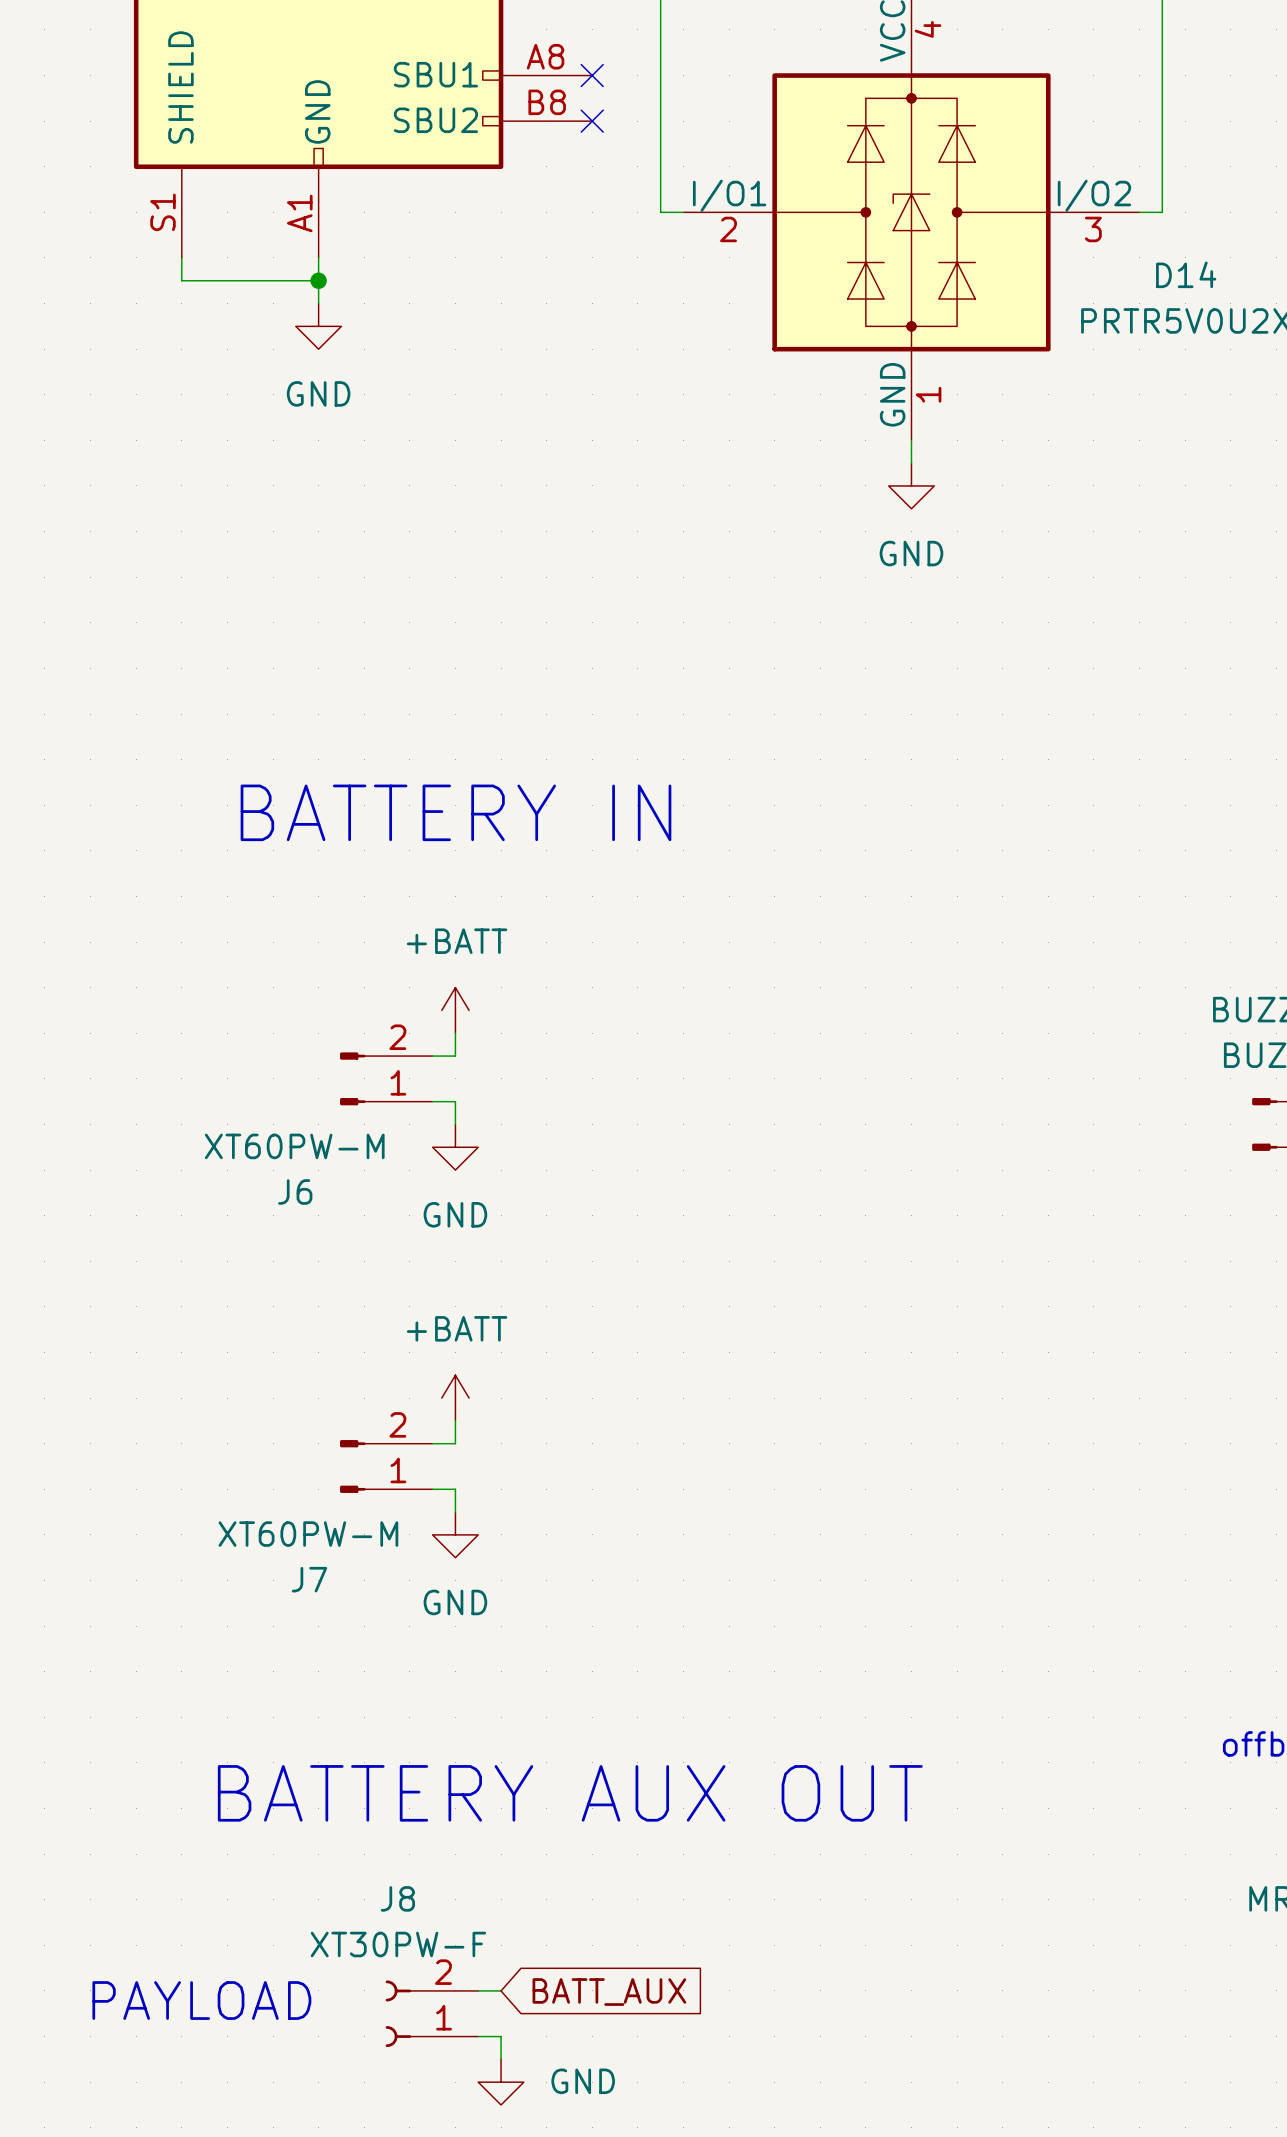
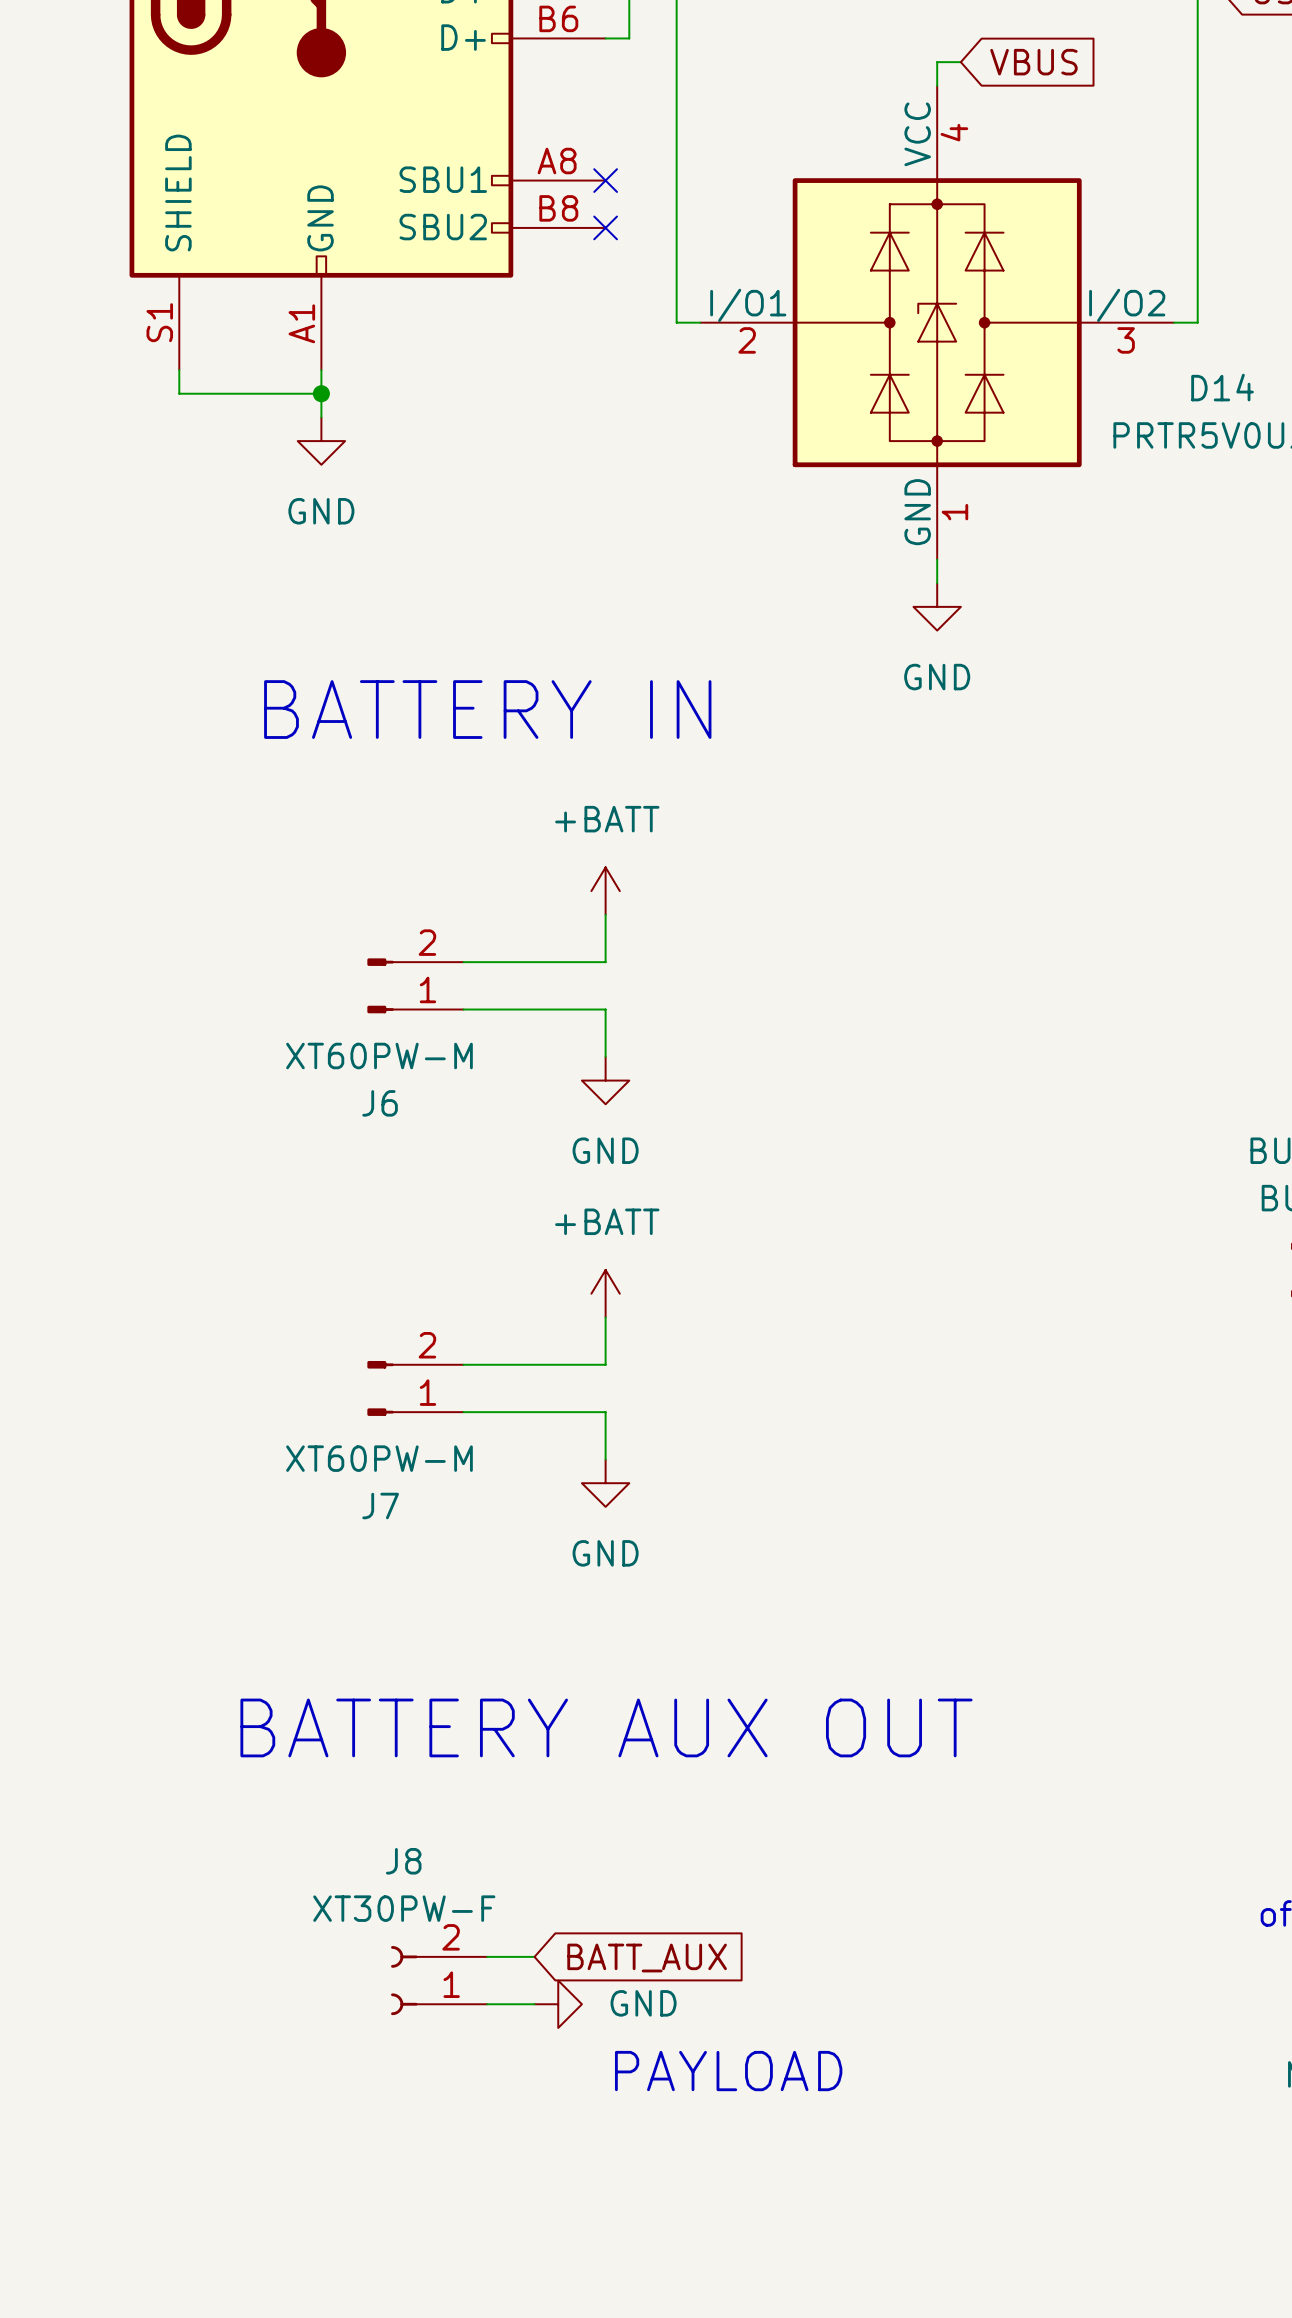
power symbol: none -> +BATT (605, 891)
wire: none -> (605, 914) (605, 962) (463, 962)
text position: BATTERY IN (455, 812) -> BATTERY IN (487, 709)
wire: none -> (463, 1009) (605, 1009) (605, 1056)
power symbol: none -> GND (605, 1080)
power symbol: +BATT (455, 1010) -> none
wire: (455, 1033) (455, 1056) (432, 1056) -> none
J6 position: (386, 1078) -> (415, 985)
wire: (432, 1101) (455, 1101) (455, 1124) -> none
J6 value position: XT60PW-M (294, 1146) -> XT60PW-M (379, 1056)
power symbol: GND (455, 1147) -> none
power symbol: none -> +BATT (605, 1293)
wire: none -> (605, 1317) (605, 1364) (463, 1364)
J6 name position: J6 (295, 1192) -> J6 (380, 1103)
wire: none -> (463, 1412) (605, 1412) (605, 1459)
power symbol: none -> GND (605, 1483)
power symbol: +BATT (455, 1398) -> none
wire: (455, 1420) (455, 1443) (432, 1443) -> none
J7 position: (386, 1466) -> (415, 1388)
wire: (432, 1489) (455, 1489) (455, 1512) -> none
J7 value position: XT60PW-M (308, 1534) -> XT60PW-M (379, 1458)
power symbol: GND (455, 1534) -> none
J7 name position: J7 (309, 1579) -> J7 (380, 1506)
wire: none -> (487, 1956) (534, 1956)
text position: BATTERY AUX OUT (570, 1793) -> BATTERY AUX OUT (606, 1727)
wire: none -> (487, 2004) (534, 2004)
power symbol: none -> GND (558, 2004)
wire: (478, 1990) (501, 1990) -> none
global label position: BATT_AUX (609, 1992) -> BATT_AUX (647, 1958)
text position: PAYLOAD (201, 2000) -> PAYLOAD (728, 2071)
J8 position: (431, 2013) -> (439, 1980)
wire: (478, 2036) (501, 2036) (501, 2059) -> none
power symbol: GND (501, 2082) -> none

